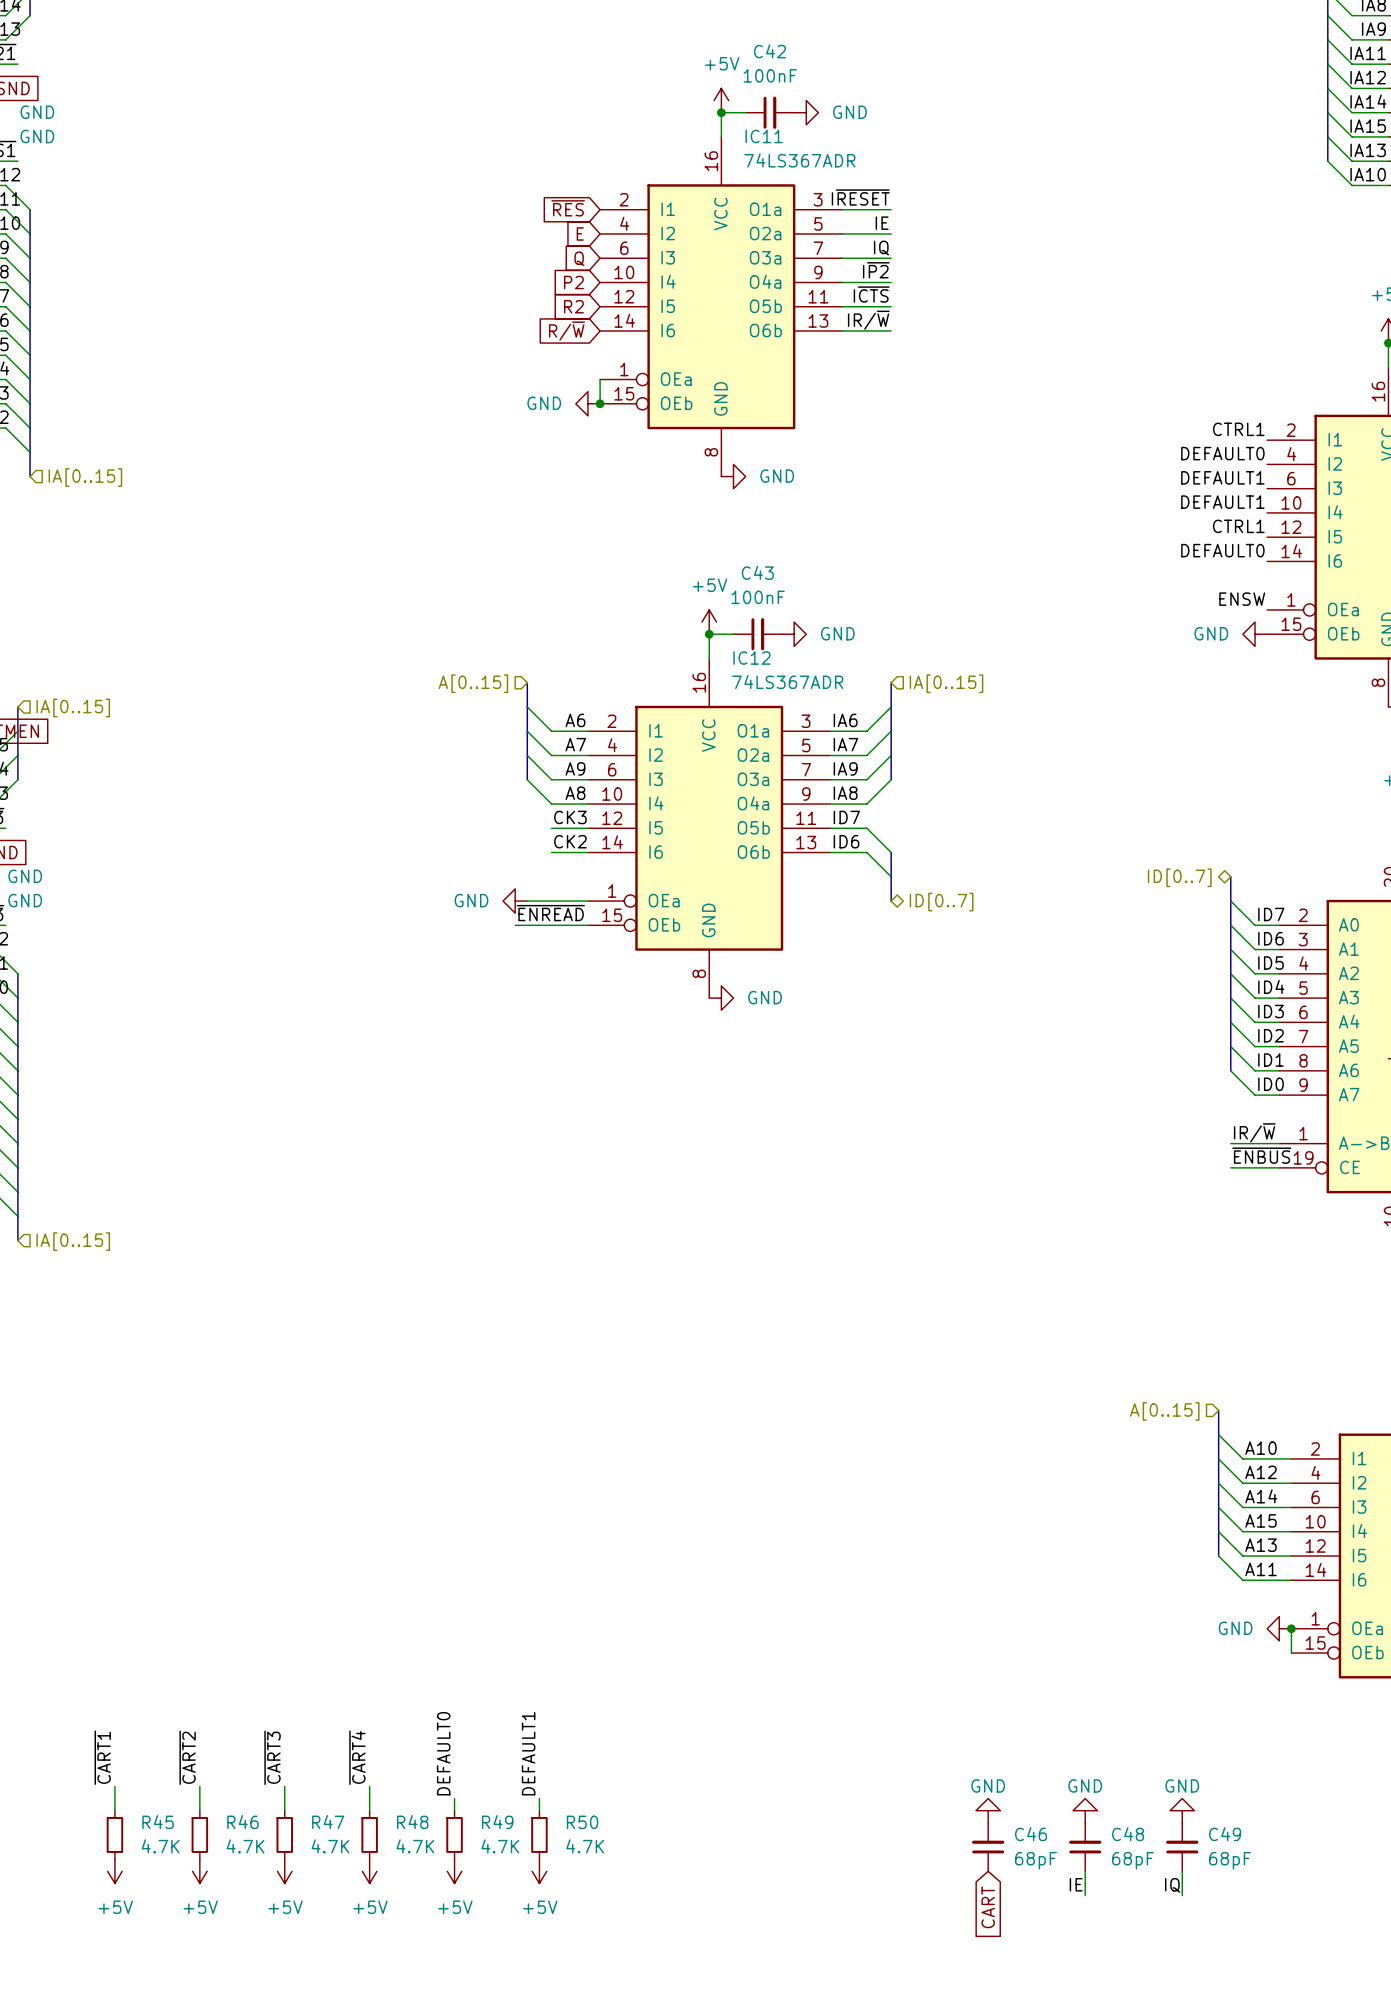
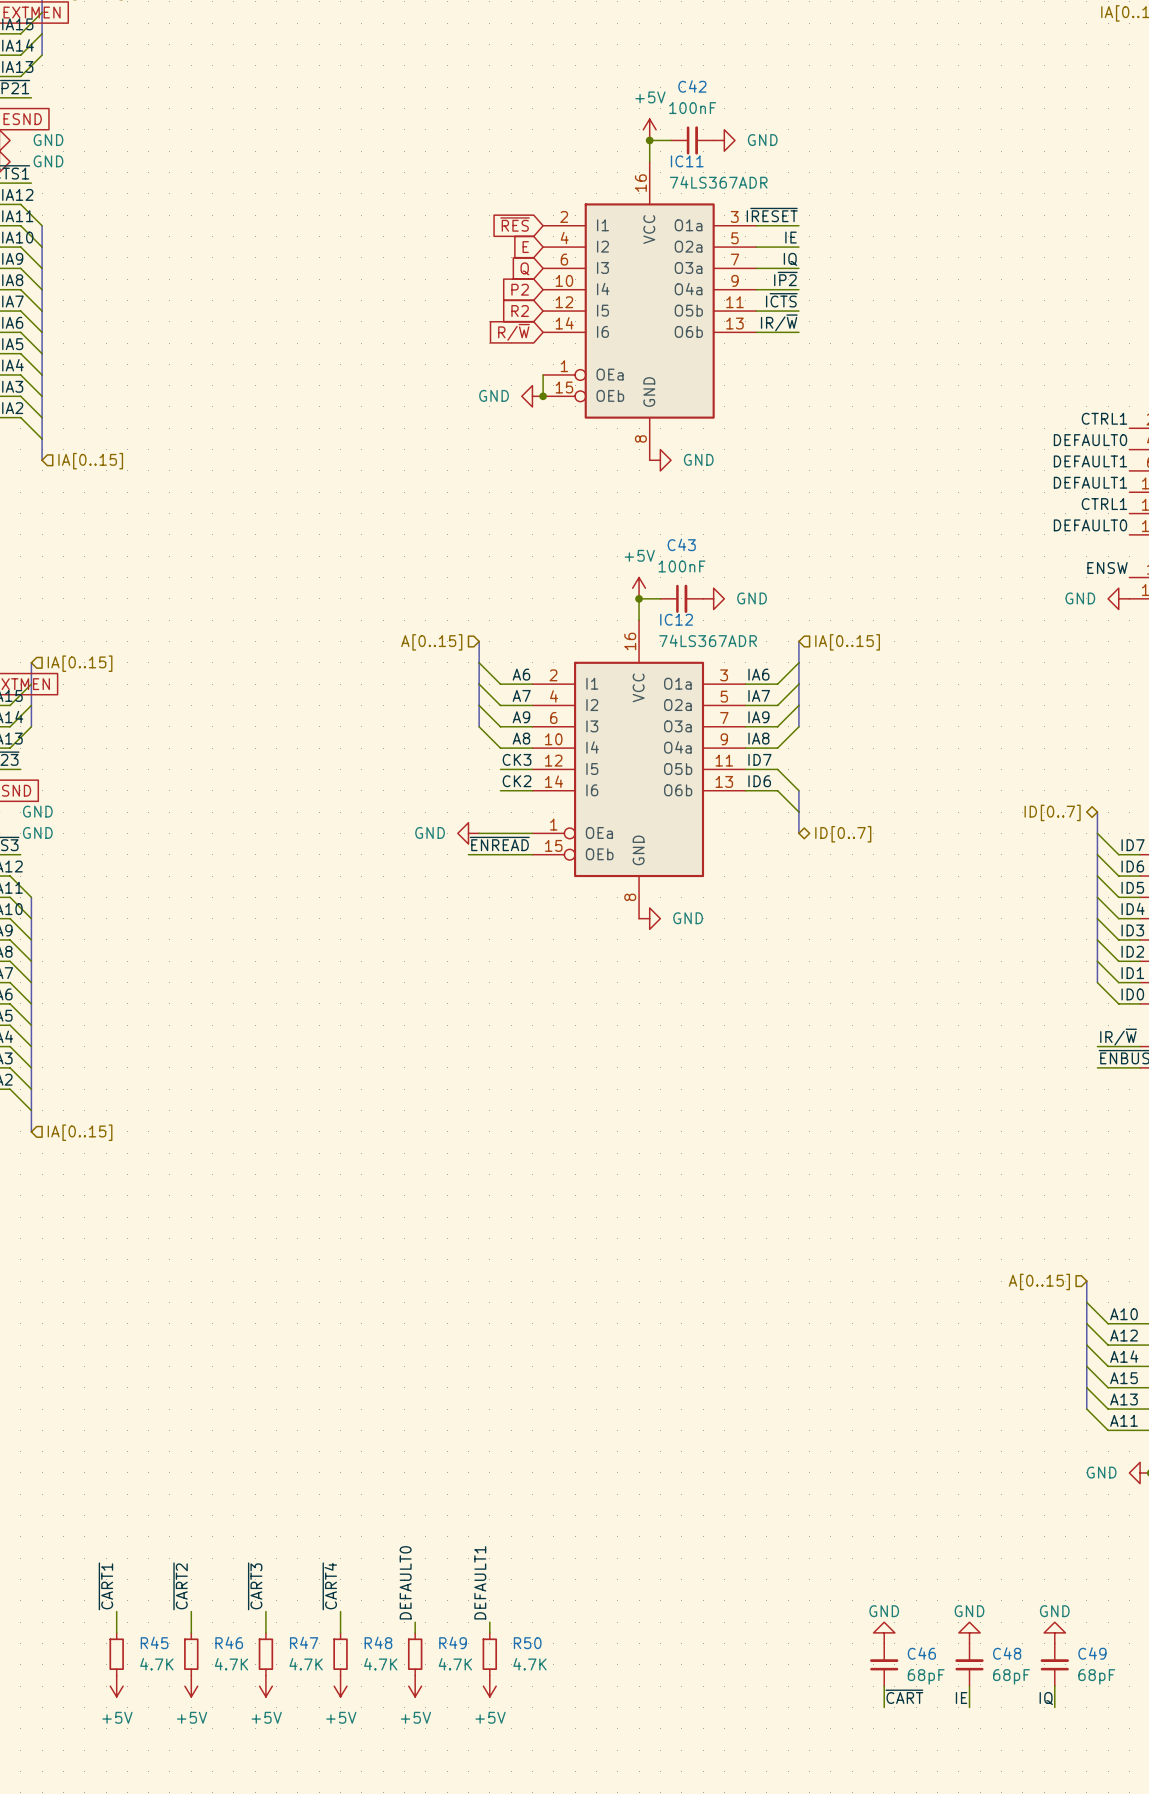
wire: none -> (884, 1686) (884, 1707)
label: none -> ~{CART} (904, 1696)
global label: CART (988, 1907) -> none

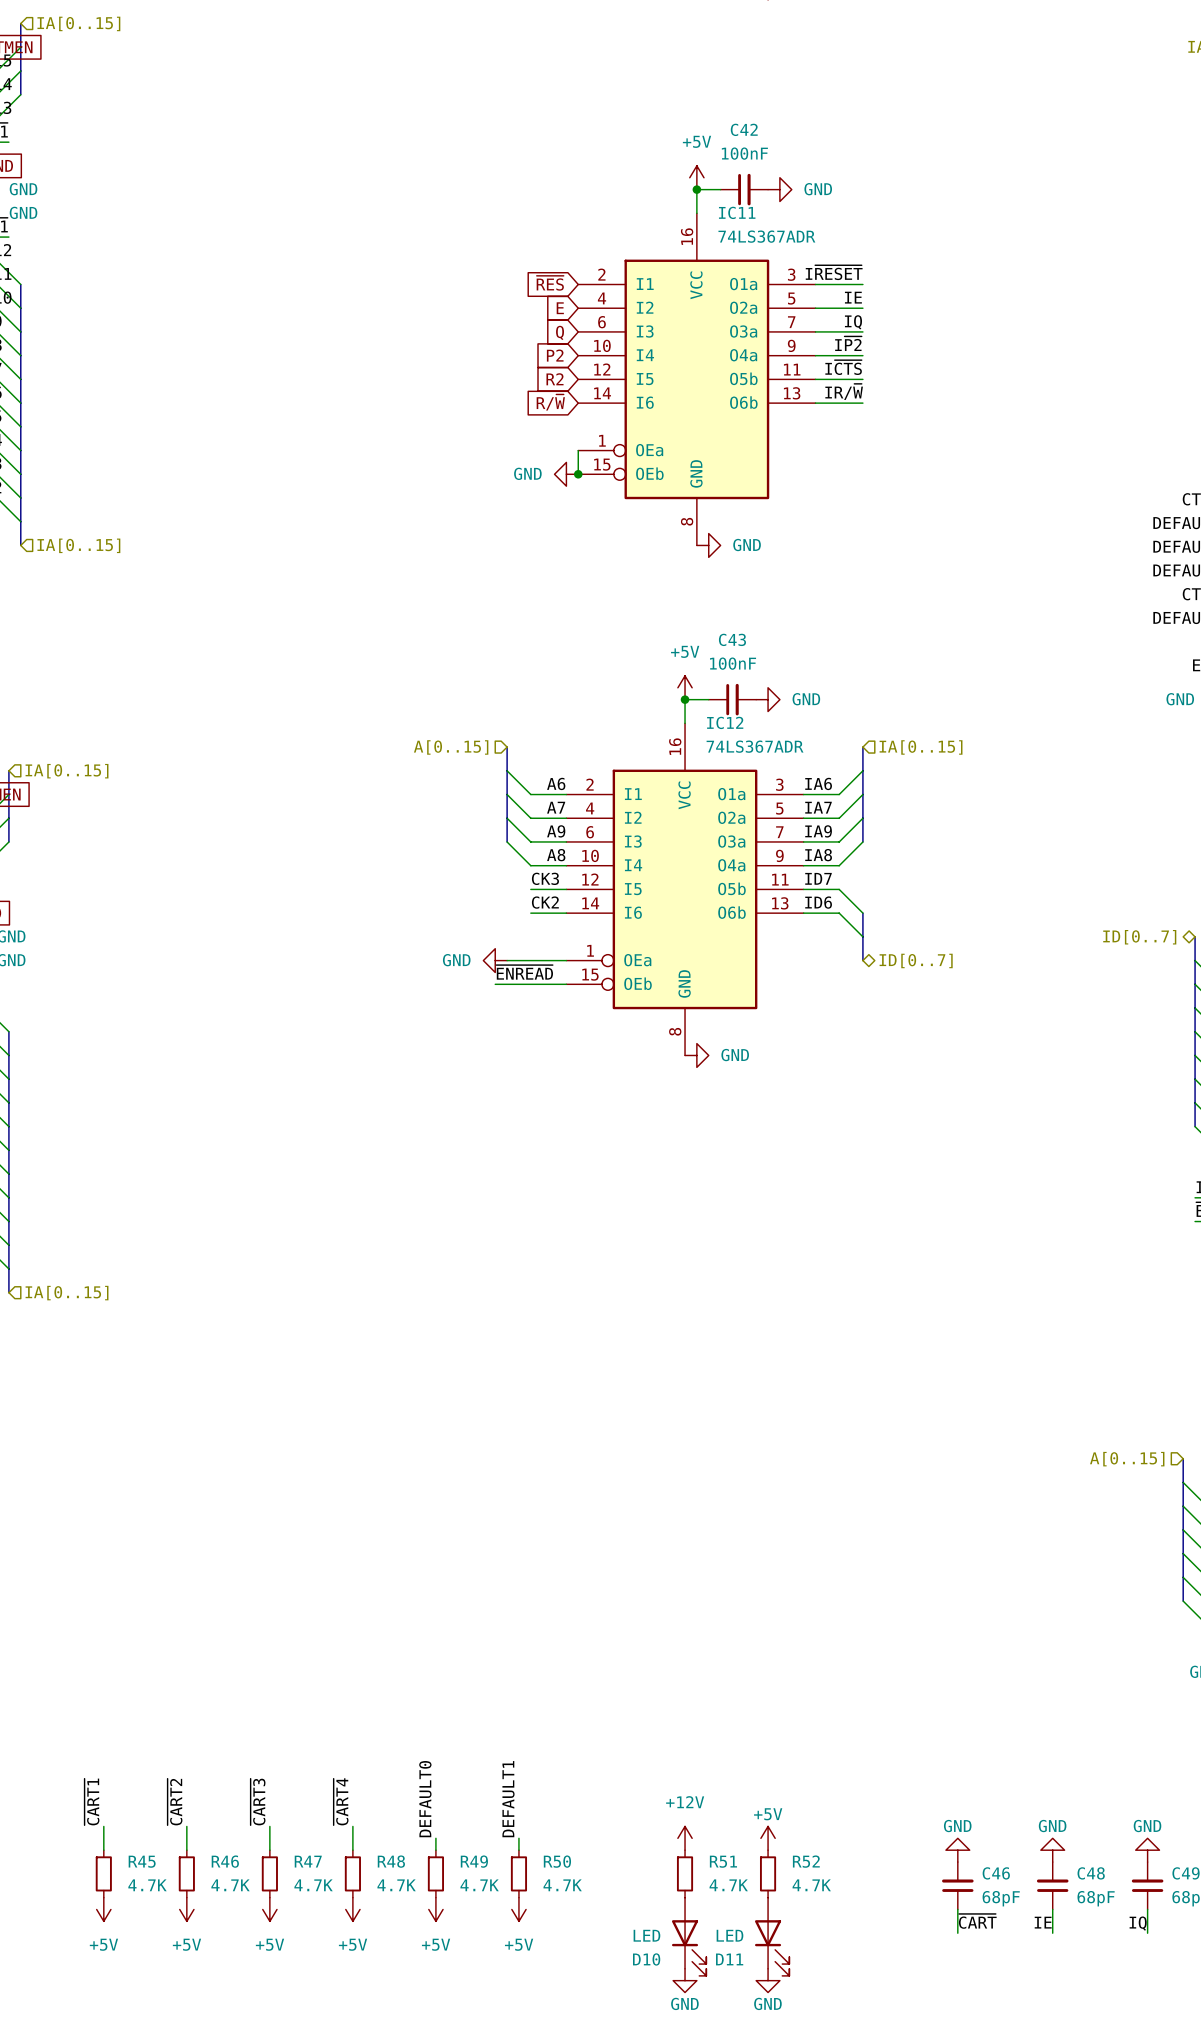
power symbol: none -> +12V (685, 1838)
power symbol: none -> +5V (768, 1838)
R51: none -> 4.7K (685, 1873)
R52: none -> 4.7K (768, 1873)
D10: none -> LED (689, 1936)
D11: none -> LED (772, 1936)
power symbol: none -> GND (685, 1980)
power symbol: none -> GND (768, 1980)

